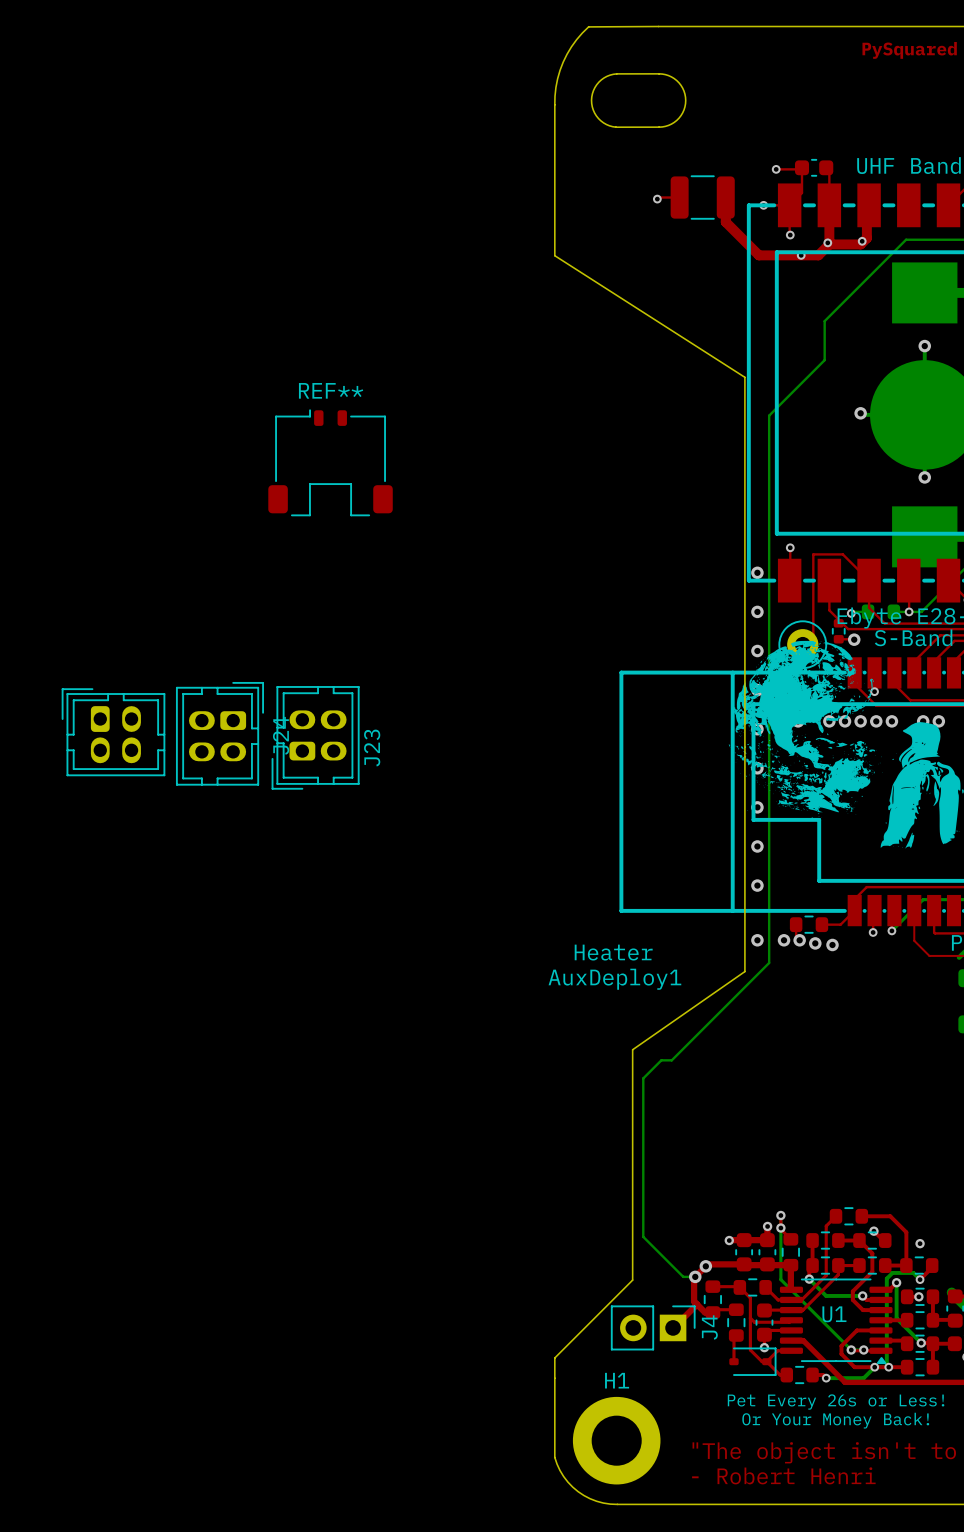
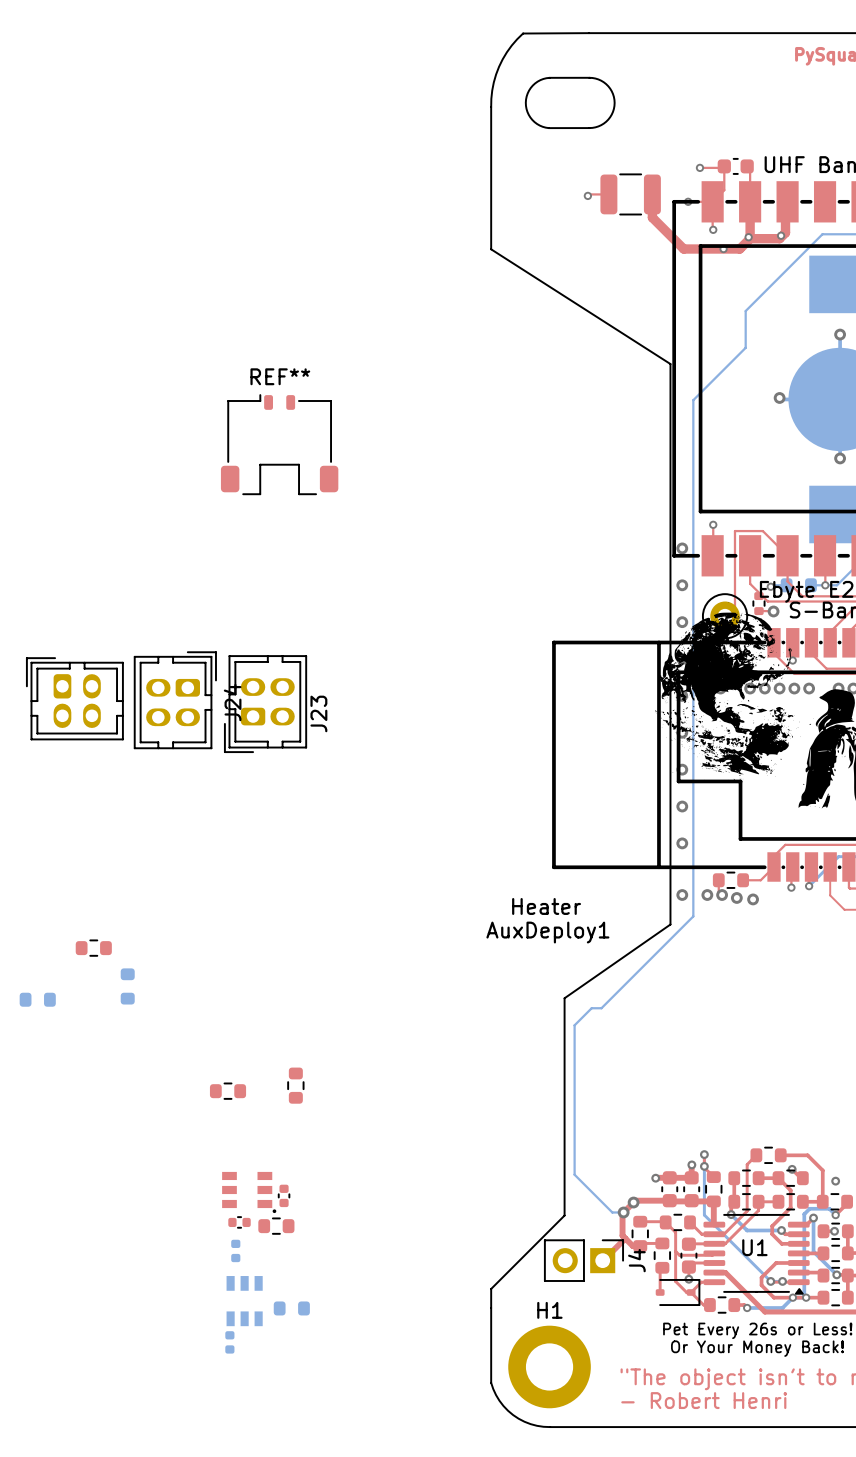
part: none -> (93, 948)
part: none -> (127, 986)
part: none -> (37, 999)
part: none -> (295, 1085)
part: none -> (228, 1091)
part: none -> (249, 1192)
part: none -> (284, 1195)
part: none -> (239, 1222)
part: none -> (276, 1226)
part: none -> (235, 1250)
part: none -> (244, 1301)
part: none -> (291, 1308)
part: none -> (229, 1342)

